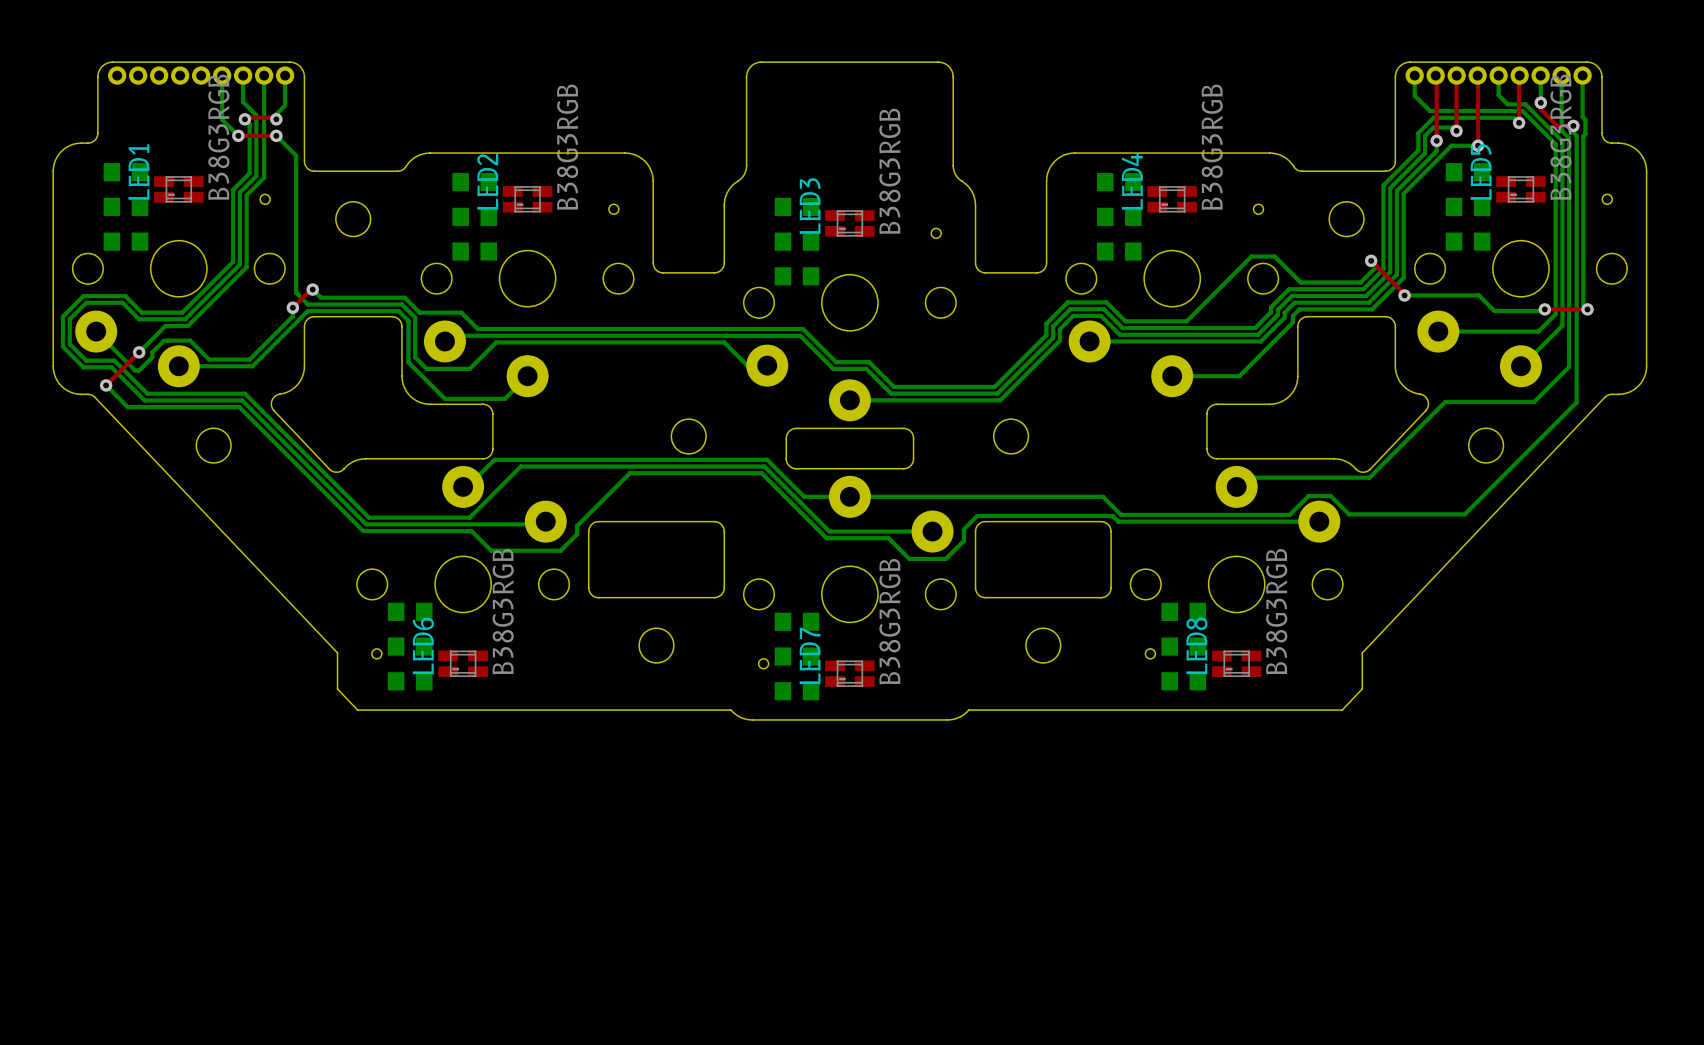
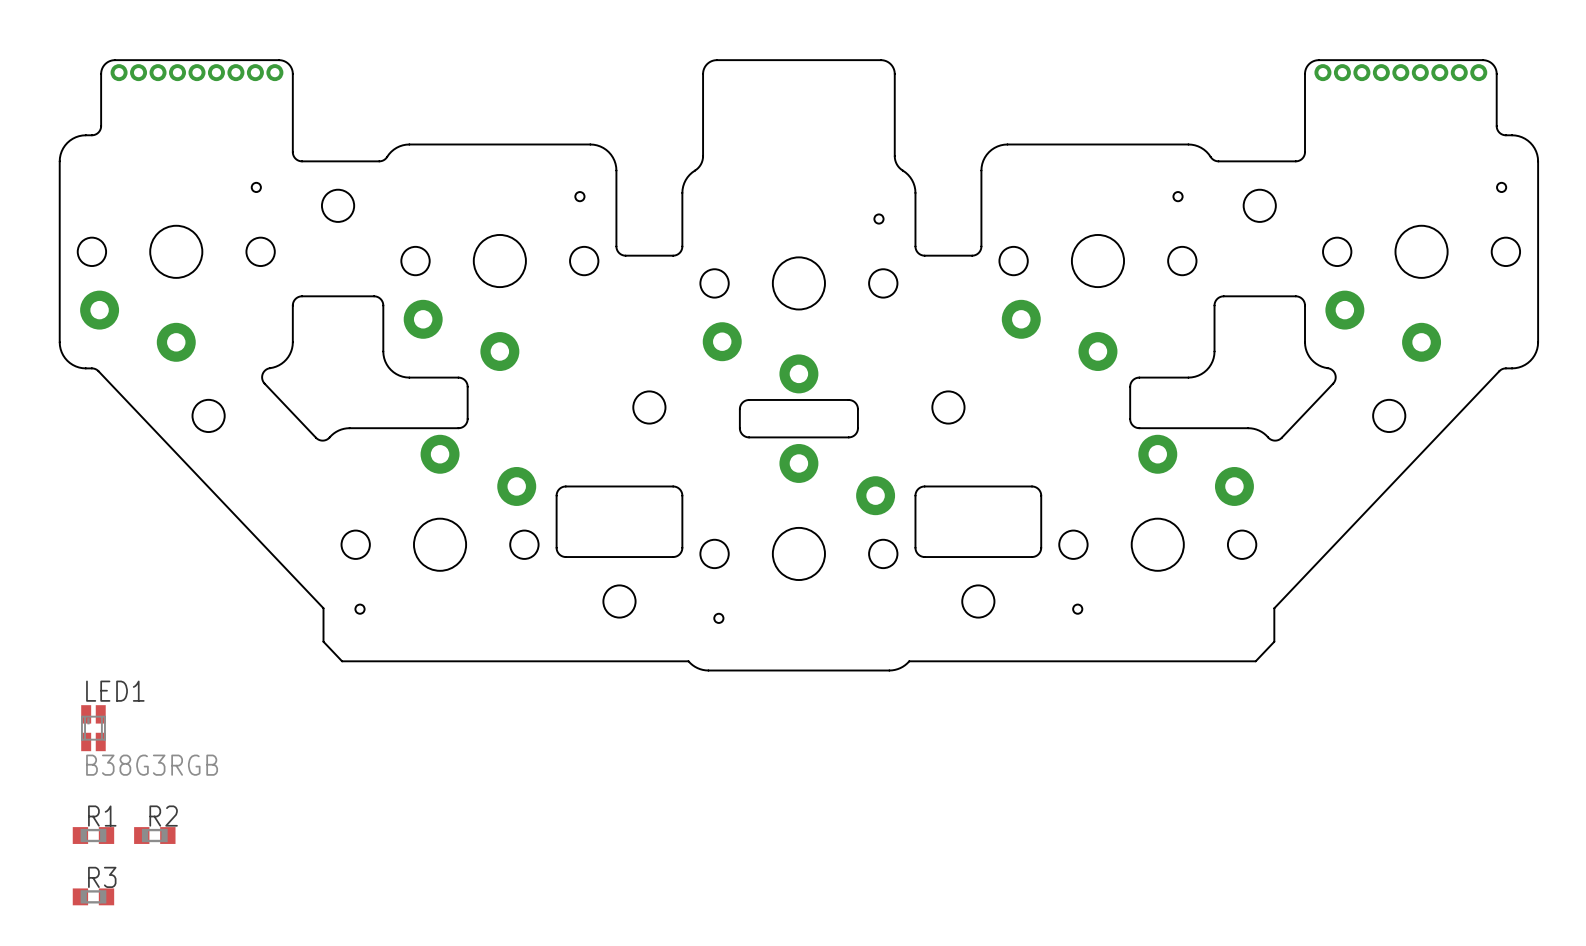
bottom track: (222, 75) (222, 119) (238, 135) -> none
bottom track: (243, 75) (243, 102) (256, 115) (256, 176) (239, 192) (239, 264) (185, 319) (139, 319) (122, 302) (86, 302) (69, 319) (69, 344) (86, 360) (114, 360) (147, 393) (244, 393) (368, 517) (469, 517) (520, 466) (764, 466) (829, 531) (932, 531) -> none
bottom track: (264, 75) (264, 177) (246, 195) (246, 267) (187, 326) (165, 326) (139, 352) -> none
bottom track: (285, 75) (285, 105) (276, 114) (276, 119) -> none
bottom track: (1414, 75) (1414, 95) (1430, 111) (1522, 111) (1555, 144) (1555, 314) (1538, 331) (1438, 331) -> none
top track: (1435, 75) (1436, 140) -> none
top track: (1456, 75) (1456, 130) -> none
top track: (1477, 75) (1478, 145) -> none
bottom track: (1498, 75) (1498, 95) (1507, 104) (1525, 104) (1562, 141) (1562, 325) (1520, 366) -> none
top track: (1519, 75) (1519, 122) -> none
bottom track: (1540, 75) (1540, 102) -> none
bottom track: (1561, 75) (1561, 130) (1569, 138) (1569, 367) (1534, 401) (1445, 401) (1369, 477) (1245, 477) (1236, 486) -> none
bottom track: (1582, 75) (1582, 116) (1585, 119) (1585, 134) (1583, 136) (1583, 305) (1587, 309) -> none
top track: (1540, 102) (1540, 109) (1557, 125) (1573, 125) -> none
via: (1540, 102) -> none
bottom track: (244, 119) (249, 124) (249, 173) (233, 189) (233, 261) (182, 312) (141, 312) (125, 296) (83, 296) (63, 316) (63, 346) (83, 367) (111, 367) (144, 400) (242, 400) (366, 524) (543, 524) (545, 521) -> none
top track: (244, 119) (246, 117) (276, 119) -> none
via: (244, 119) -> none
via: (276, 119) -> none
bottom track: (1519, 122) (1513, 117) (1433, 117) (1418, 133) (1418, 150) (1383, 185) (1383, 269) (1363, 289) (1289, 289) (1271, 307) (1271, 312) (1255, 328) (1122, 328) (1103, 309) (1070, 309) (1053, 326) (1053, 338) (997, 393) (891, 393) (866, 368) (833, 368) (800, 335) (727, 335) -> none
via: (1519, 122) -> none
bottom track: (1573, 125) (1573, 132) (1576, 135) (1576, 402) (1464, 514) (1349, 514) (1330, 496) (1308, 496) (1289, 514) (1121, 514) (1103, 496) (804, 496) (767, 459) (494, 459) (467, 486) (463, 486) -> none
via: (1573, 125) -> none
bottom track: (1456, 130) (1453, 127) (1433, 127) (1425, 135) (1425, 153) (1390, 188) (1390, 272) (1366, 295) (1291, 295) (1277, 309) (1277, 314) (1258, 334) (1119, 334) (1100, 315) (1073, 315) (1059, 329) (1059, 340) (1000, 400) (849, 400) -> none
via: (1456, 130) -> none
top track: (238, 135) (276, 135) -> none
via: (238, 135) -> none
bottom track: (276, 135) (296, 155) (296, 292) (307, 304) (401, 304) (415, 317) (415, 357) (426, 368) (469, 368) (496, 342) (724, 342) (747, 365) (767, 365) -> none
via: (276, 135) -> none
bottom track: (1436, 140) (1436, 151) (1396, 190) (1396, 274) (1369, 302) (1294, 302) (1284, 312) (1284, 317) (1260, 341) (1089, 341) -> none
via: (1436, 140) -> none
bottom track: (1478, 145) (1451, 145) (1403, 193) (1403, 277) (1372, 309) (1299, 309) (1292, 316) (1292, 322) (1239, 376) (1172, 376) -> none
via: (1478, 145) -> none
part: (125, 172) -> none
part: (1468, 172) -> none
part: (474, 182) -> none
part: (1119, 182) -> none
LED1 rotation: 0° (178, 189) -> 90° clockwise (93, 728)
LED1 position: (178, 189) -> (93, 728)
LED5: B38G3RGB (1520, 189) -> none
LED2: B38G3RGB (527, 199) -> none
LED4: B38G3RGB (1172, 199) -> none
part: (125, 206) -> none
part: (797, 206) -> none
part: (1468, 206) -> none
part: (474, 216) -> none
part: (1119, 216) -> none
LED3: B38G3RGB (849, 223) -> none
part: (125, 241) -> none
part: (797, 241) -> none
part: (1468, 241) -> none
part: (474, 251) -> none
part: (1119, 251) -> none
bottom track: (1371, 260) (1376, 266) (1360, 282) (1300, 282) (1274, 256) (1251, 256) (1186, 321) (1125, 321) (1106, 302) (1067, 302) (1046, 323) (1046, 335) (994, 386) (893, 386) (869, 362) (836, 362) (802, 329) (477, 329) (461, 312) (419, 312) (404, 297) (320, 297) (312, 289) -> none
top track: (1371, 260) (1404, 295) -> none
via: (1371, 260) -> none
part: (797, 276) -> none
top track: (312, 289) (292, 307) -> none
via: (312, 289) -> none
bottom track: (1404, 295) (1478, 295) (1494, 311) (1543, 311) (1544, 309) -> none
via: (1404, 295) -> none
bottom track: (292, 307) (292, 316) (249, 359) (209, 359) (190, 340) (168, 340) -> none
via: (292, 307) -> none
top track: (1544, 309) (1587, 309) -> none
via: (1544, 309) -> none
via: (1587, 309) -> none
bottom track: (96, 331) (135, 370) (139, 370) (152, 357) (152, 352) (163, 340) (168, 340) -> none
bottom track: (727, 335) (450, 335) (444, 341) -> none
top track: (139, 352) (106, 385) -> none
via: (139, 352) -> none
bottom track: (178, 366) (252, 366) (307, 311) (398, 311) (408, 320) (408, 362) (444, 398) (504, 398) (527, 376) -> none
bottom track: (106, 385) (127, 407) (239, 407) (363, 531) (471, 531) (491, 550) (560, 550) (577, 534) (577, 525) (629, 473) (761, 473) (826, 538) (888, 538) (909, 558) (945, 558) (963, 540) (963, 529) (977, 516) (1112, 516) (1118, 521) (1319, 521) -> none
via: (106, 385) -> none
part: (410, 611) -> none
part: (1183, 611) -> none
part: (797, 621) -> none
part: (410, 646) -> none
part: (1183, 646) -> none
part: (797, 656) -> none
LED6: B38G3RGB (463, 663) -> none
LED8: B38G3RGB (1236, 663) -> none
LED7: B38G3RGB (849, 673) -> none
part: (410, 681) -> none
part: (1183, 681) -> none
part: (797, 691) -> none
R1: none -> (93, 835)
R2: none -> (154, 835)
R3: none -> (93, 896)

